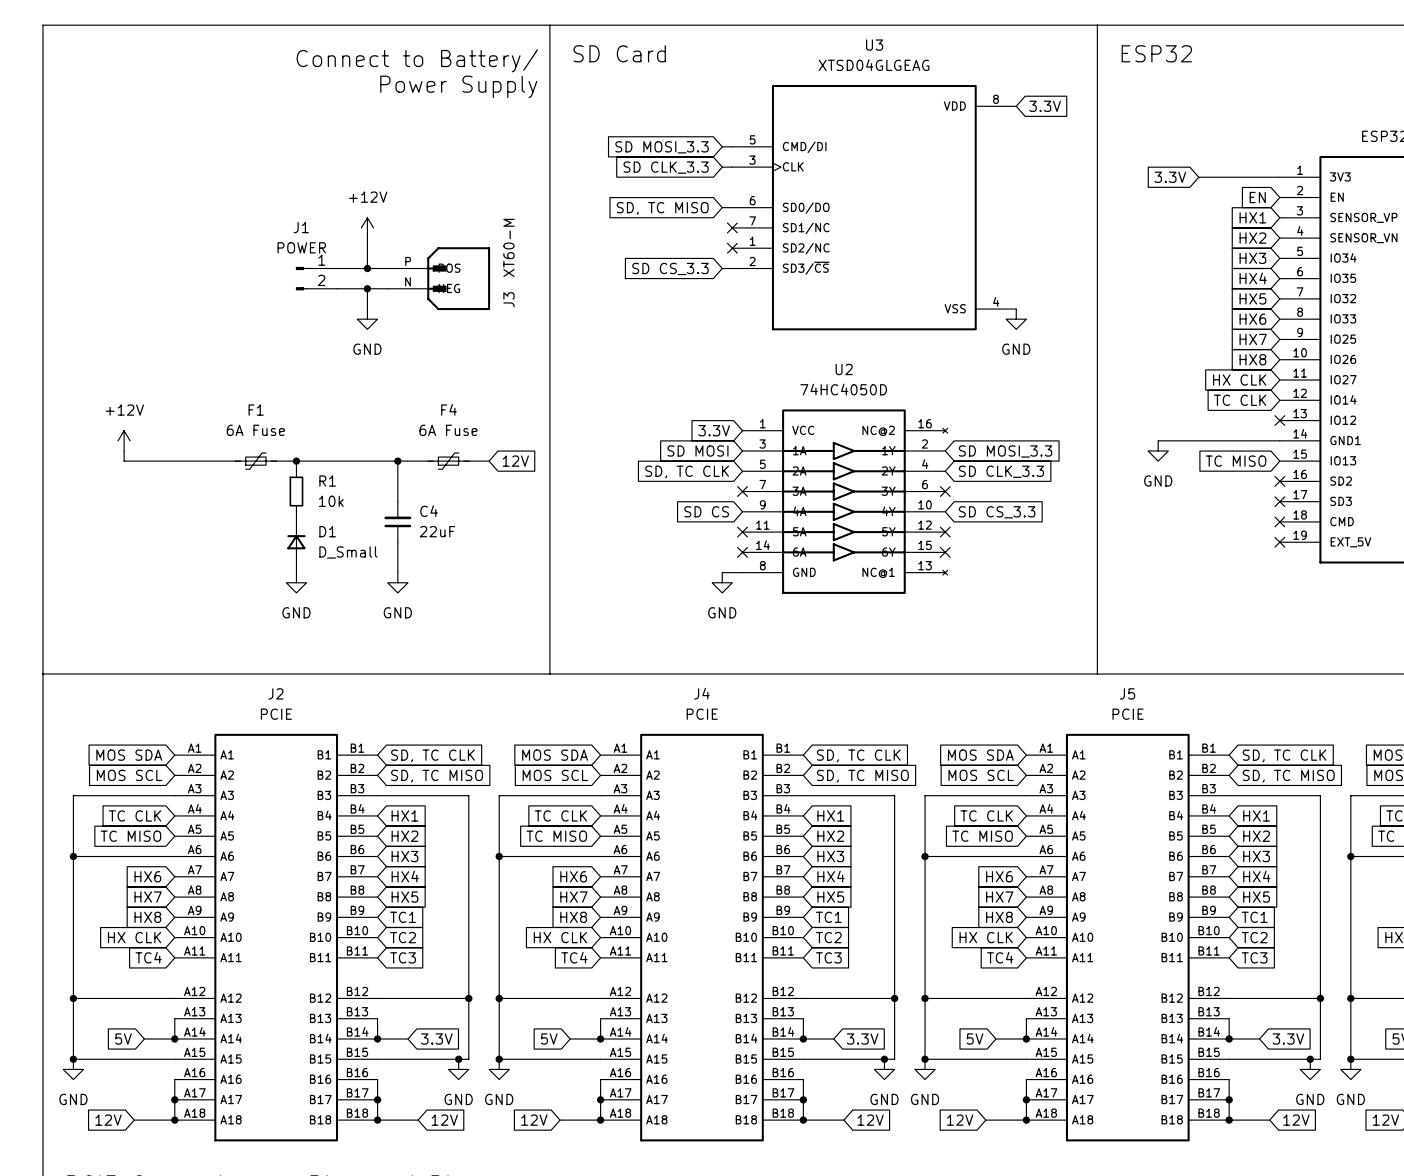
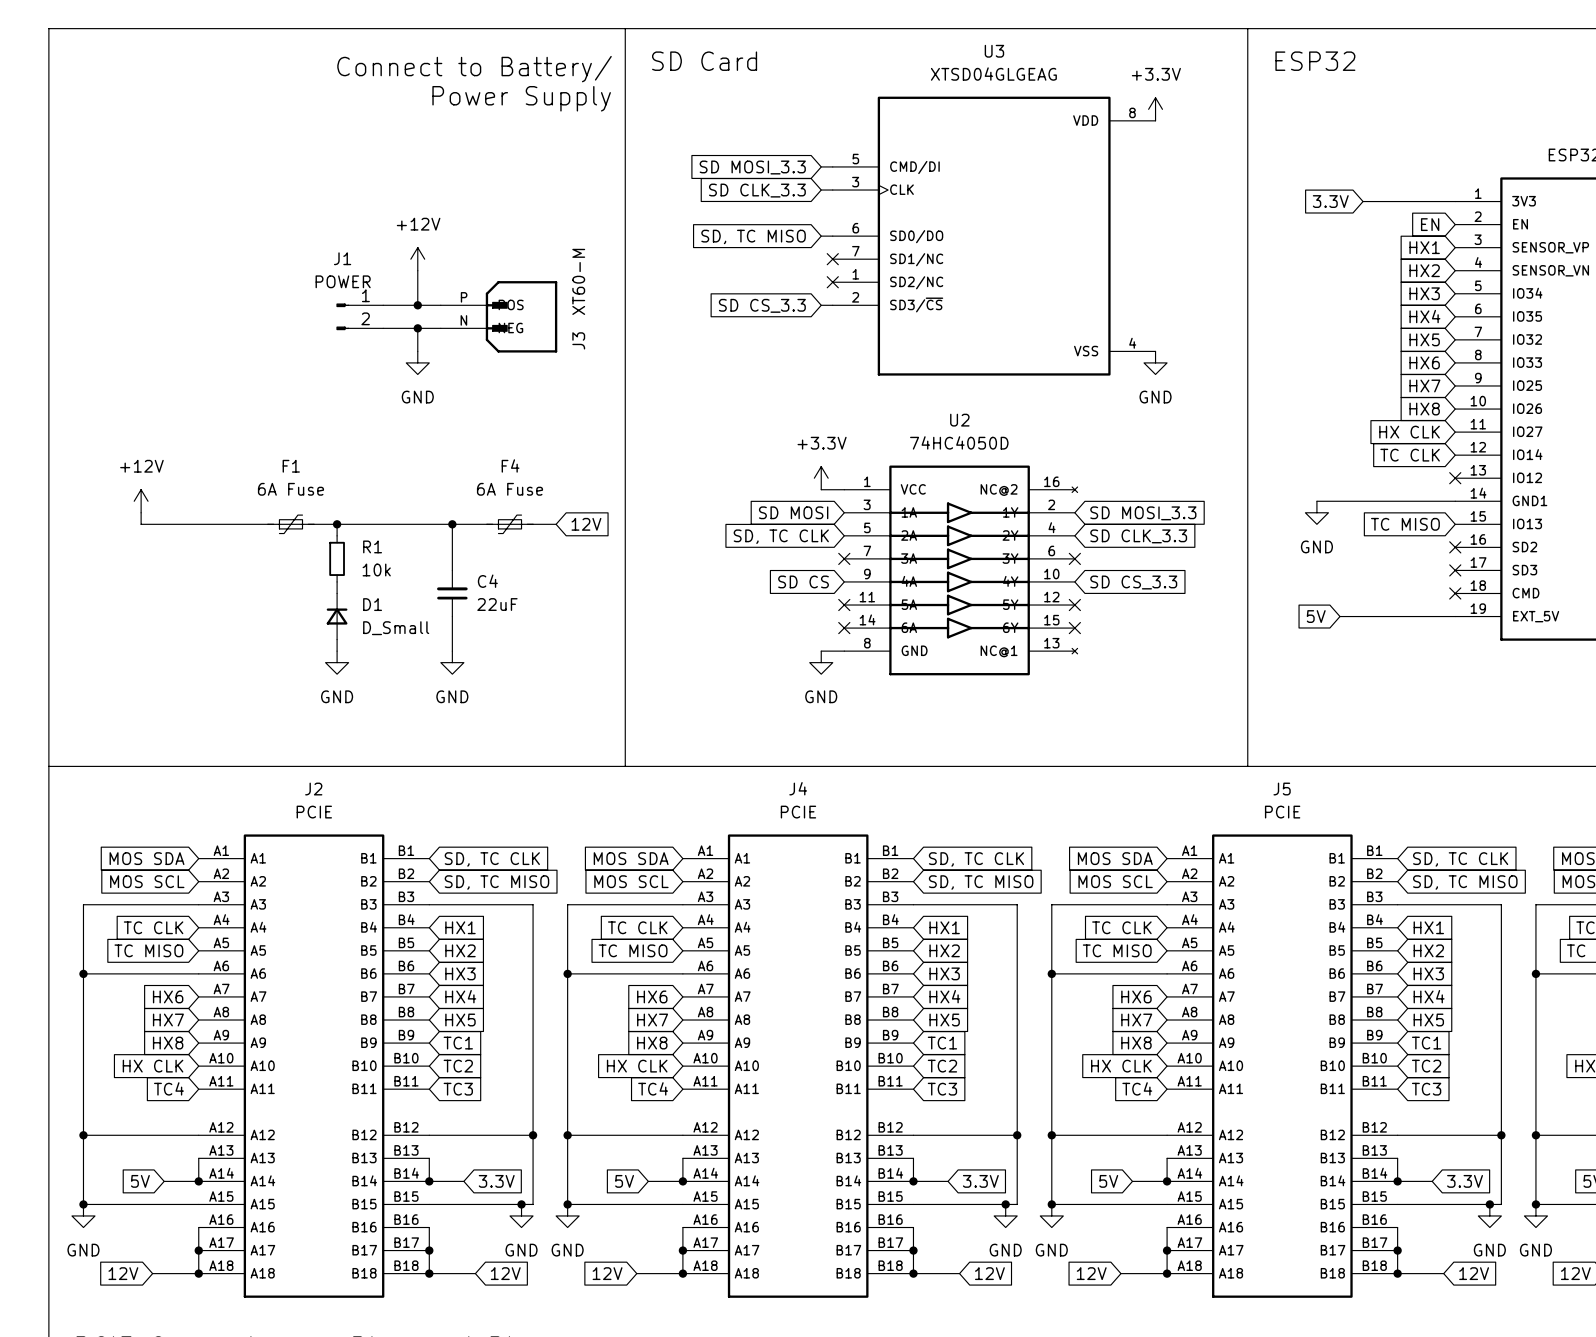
power symbol: none -> +3.3V (1155, 109)
global label: 3.3V (1045, 106) -> none
power symbol: none -> +3.3V (821, 478)
global label: 3.3V (714, 430) -> none
wire: none -> (821, 489) (844, 489)
global label: none -> 5V (1316, 616)
wire: none -> (1339, 616) (1455, 616)
no-connect mark: (1279, 542) -> none

